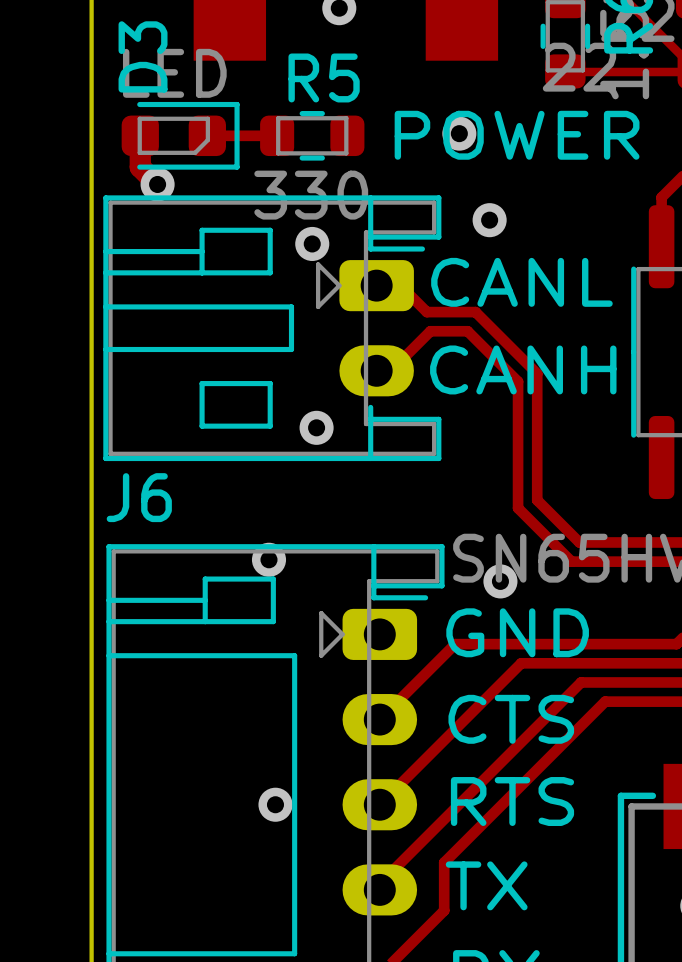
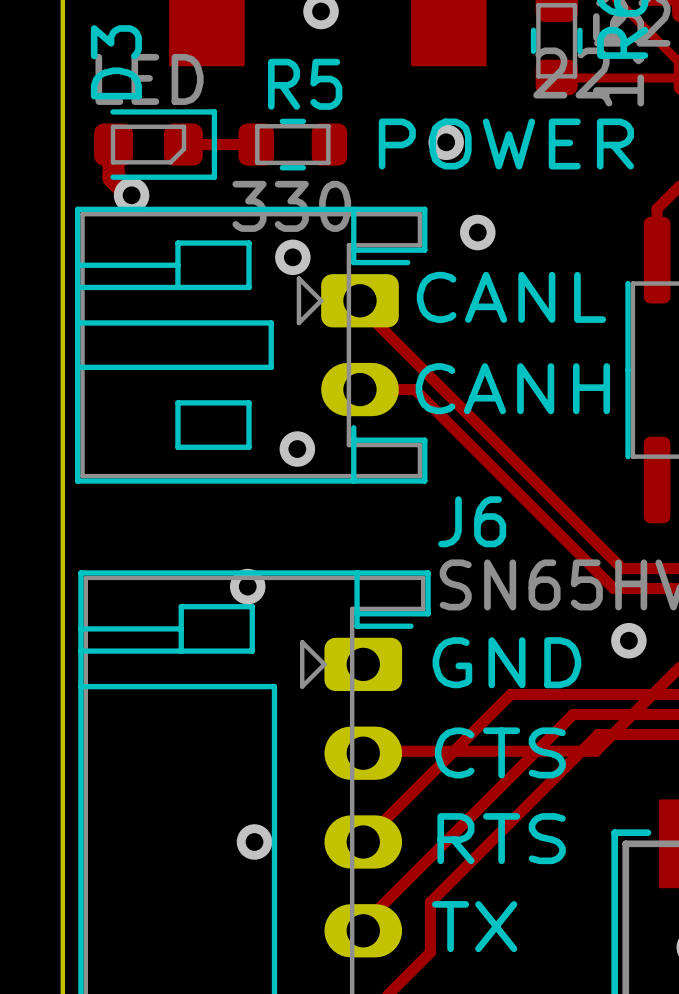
top track: (376, 285) (400, 285) (426, 312) (475, 312) (537, 373) (537, 500) (579, 542) (628, 542) -> (359, 300) (359, 306) (622, 568)
top track: (390, 370) (430, 331) (467, 331) (518, 381) (518, 508) (571, 561) (620, 561) -> (374, 389) (414, 389) (613, 588)
J6 name position: J6 (139, 497) -> J6 (472, 521)
via: (500, 581) -> none
via: none -> (628, 640)
top track: (676, 644) (455, 644) (381, 717) -> (672, 674) (595, 751) (365, 751)

